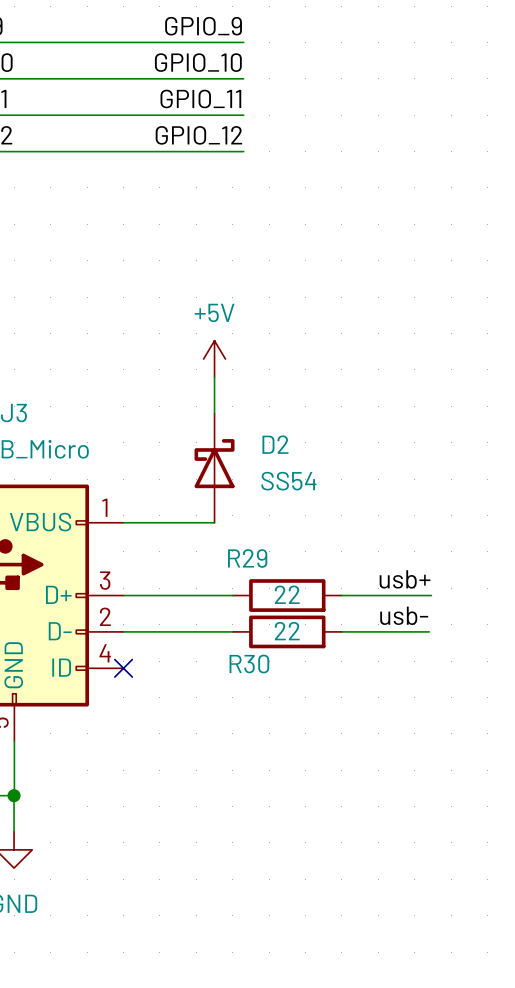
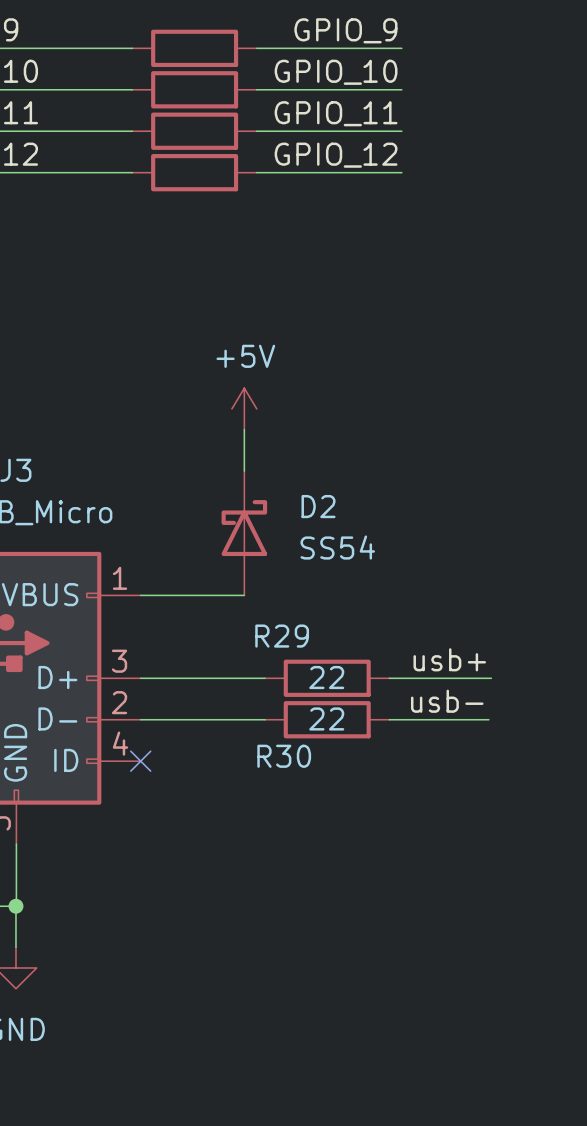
label position: GPIO_9 (203, 26) -> GPIO_9 (345, 30)
wire: (116, 42) (225, 42) -> (277, 48) (401, 48)
part: none -> (194, 48)
label position: GPIO_10 (198, 62) -> GPIO_10 (336, 72)
wire: (116, 78) (225, 78) -> (277, 89) (401, 89)
part: none -> (194, 89)
label position: GPIO_11 (200, 98) -> GPIO_11 (336, 113)
wire: (116, 115) (225, 115) -> (277, 131) (401, 131)
part: none -> (194, 131)
label position: GPIO_12 (198, 135) -> GPIO_12 (336, 155)
wire: (116, 151) (225, 151) -> (277, 172) (401, 172)
part: none -> (194, 172)

